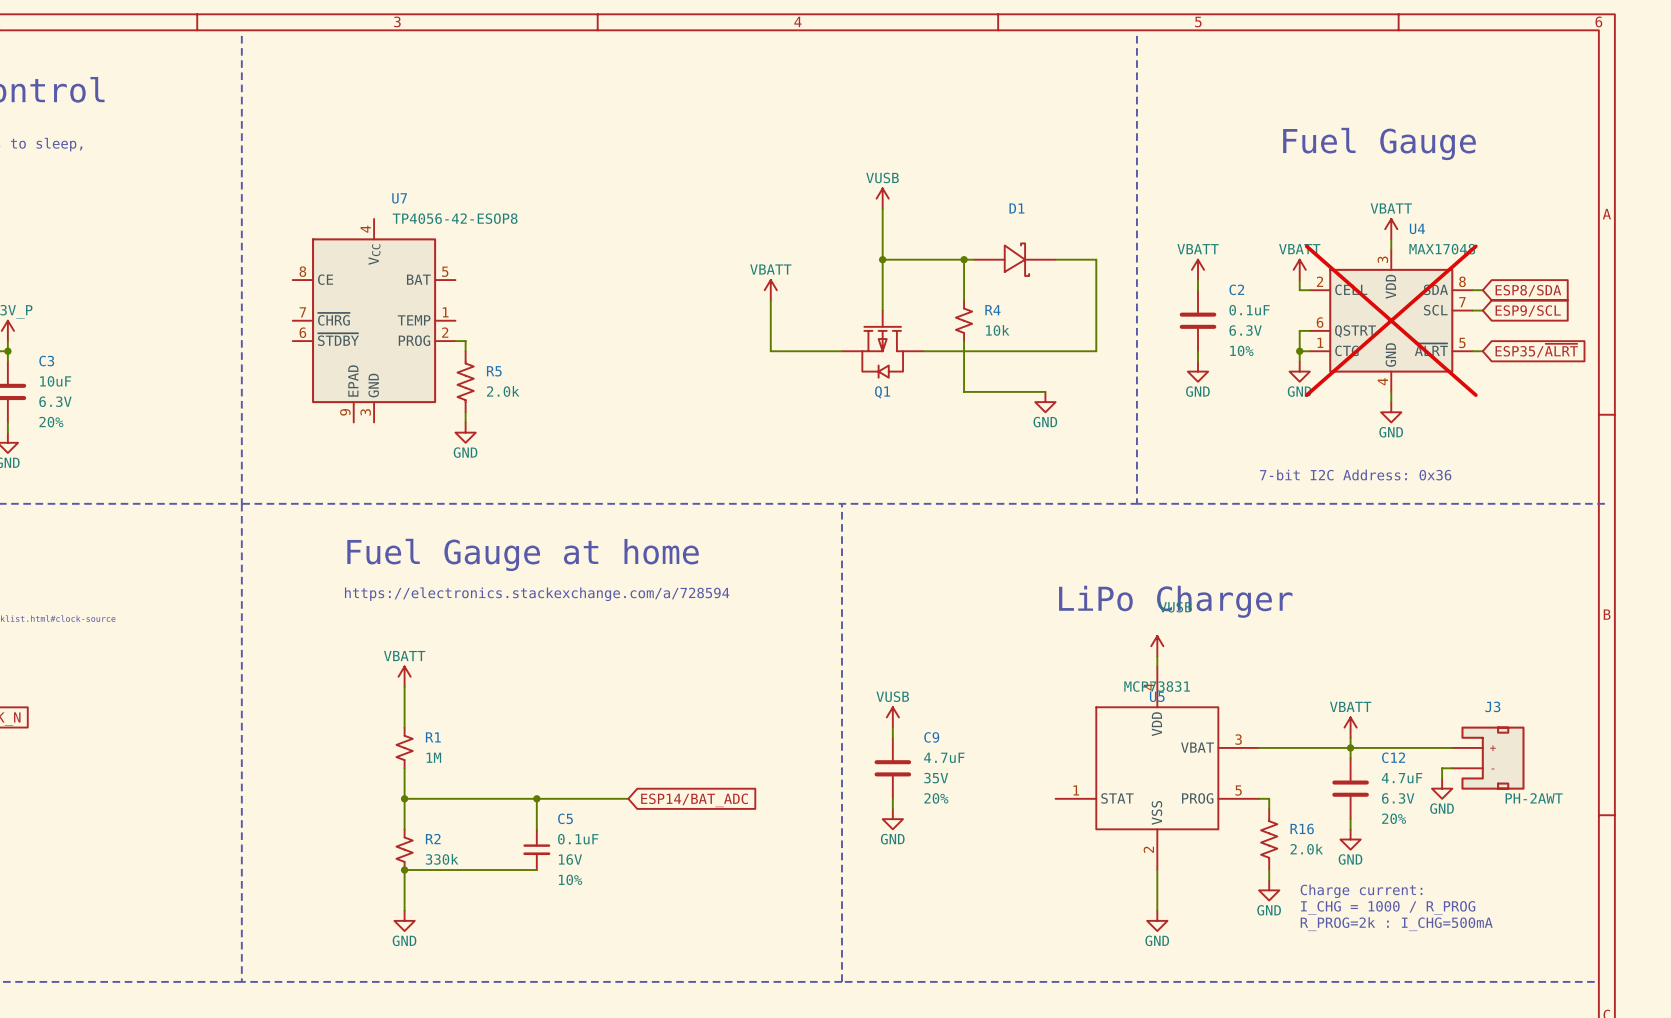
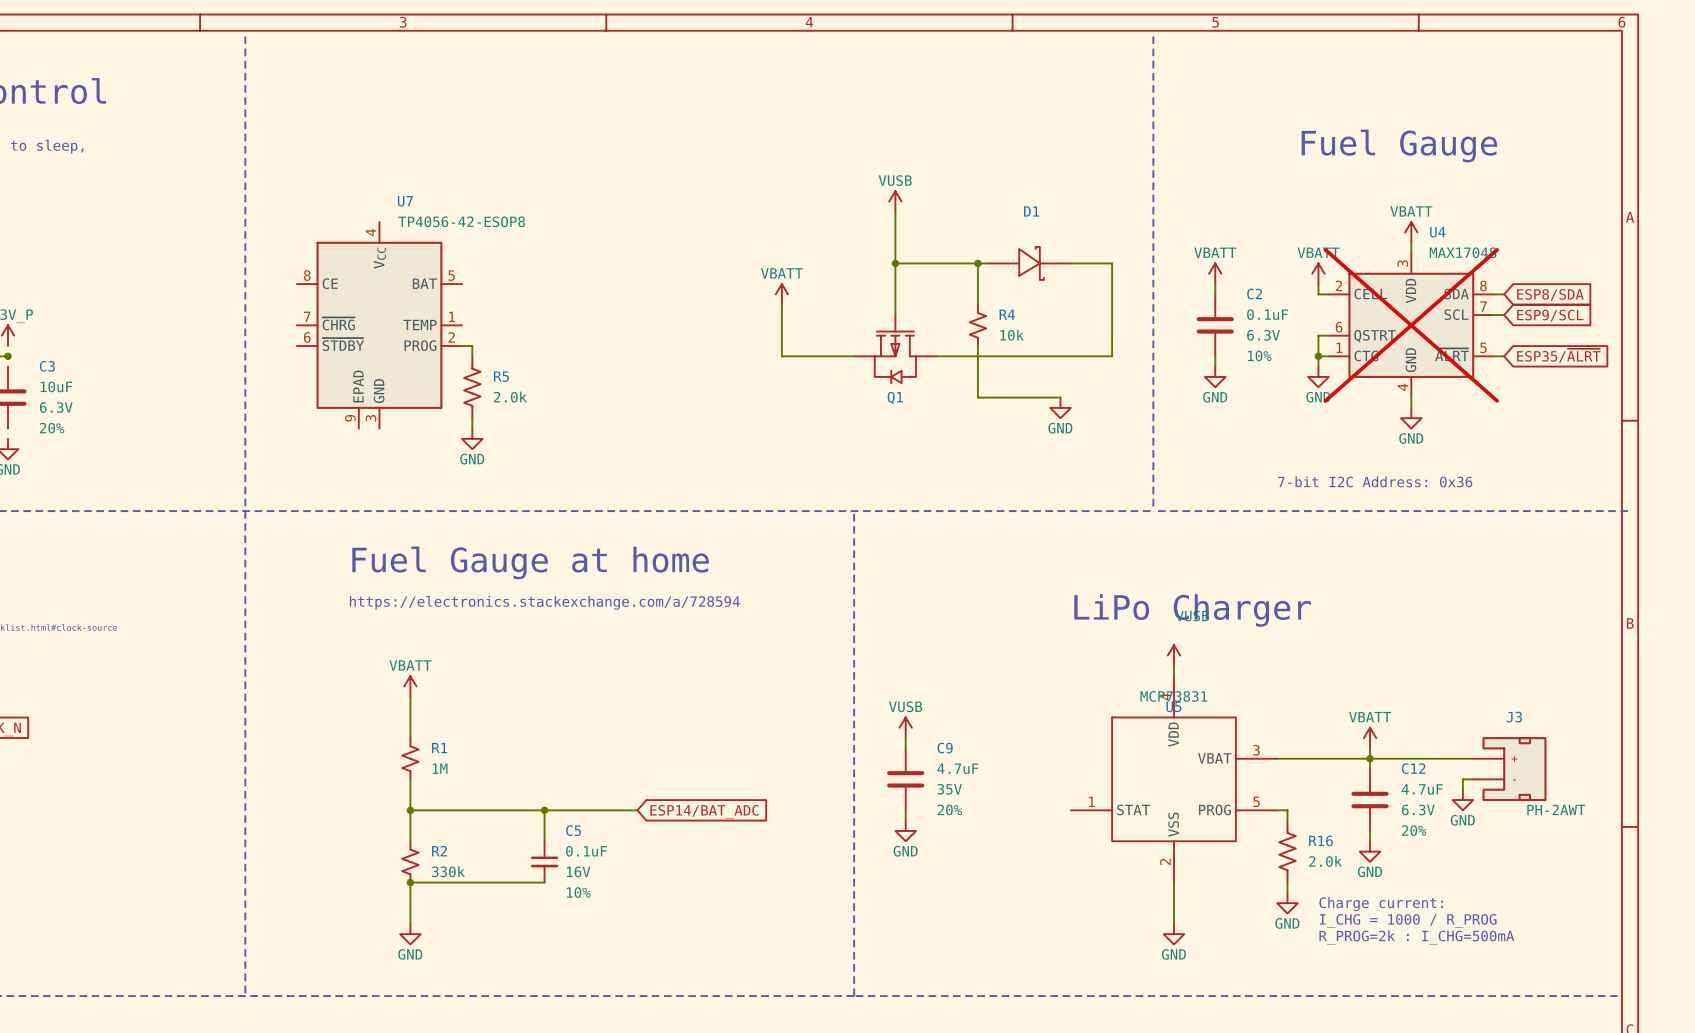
wire: (7, 341) (7, 361) -> none
wire: (7, 422) (7, 432) -> none

